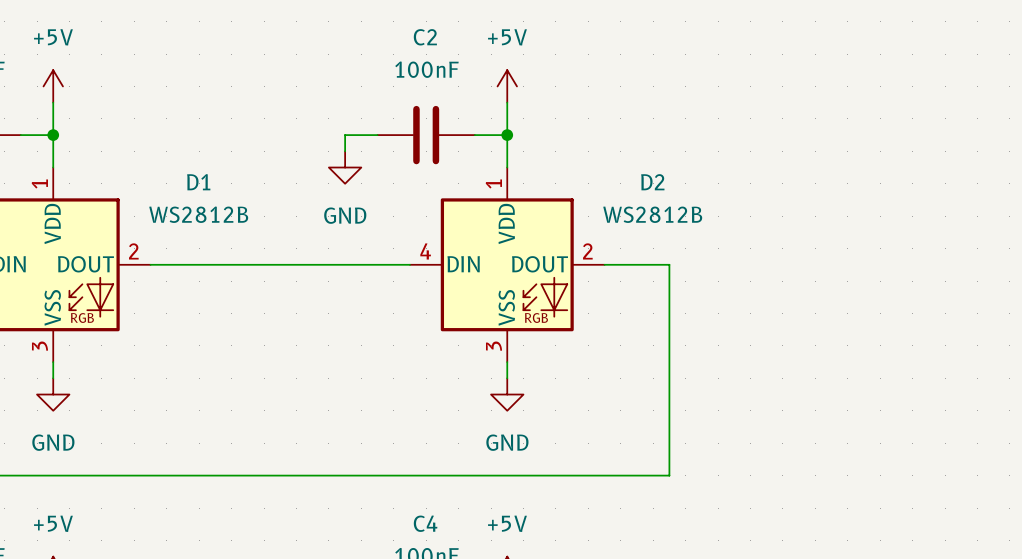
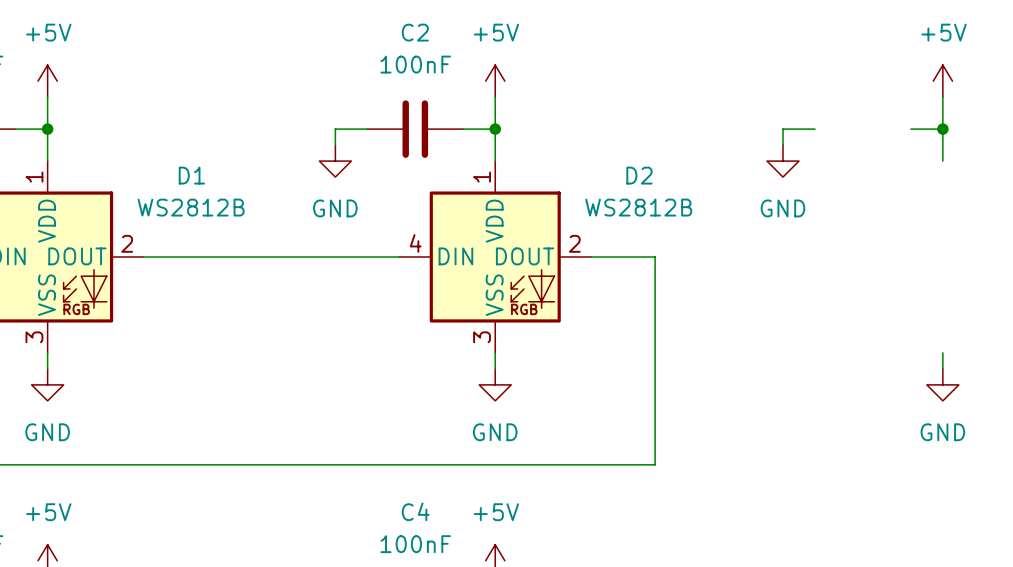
power symbol: none -> +5V (942, 81)
wire: none -> (942, 97) (942, 161)
wire: none -> (814, 129) (782, 129) (782, 145)
wire: none -> (910, 129) (942, 129)
junction: none -> (942, 129)
power symbol: none -> GND (782, 161)
wire: none -> (942, 352) (942, 368)
power symbol: none -> GND (942, 384)

